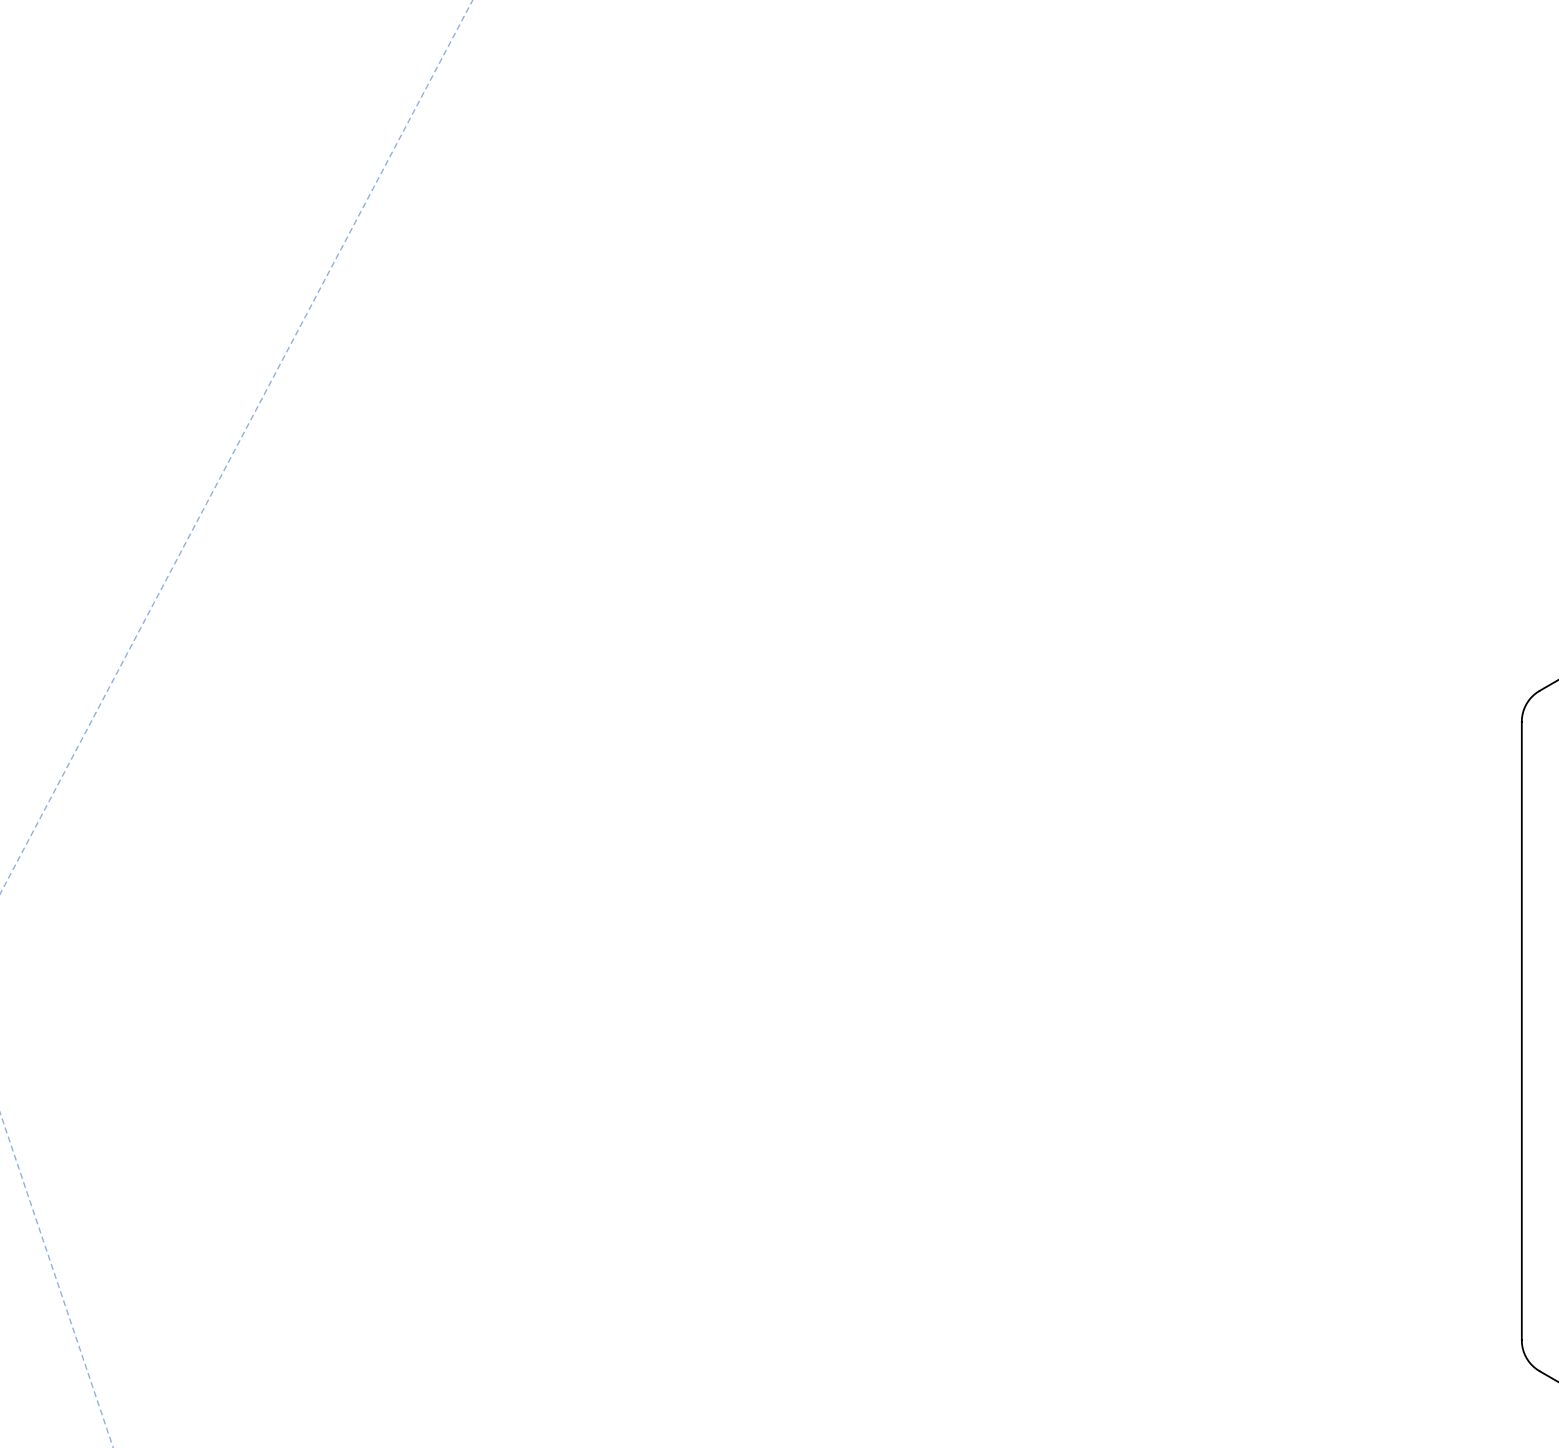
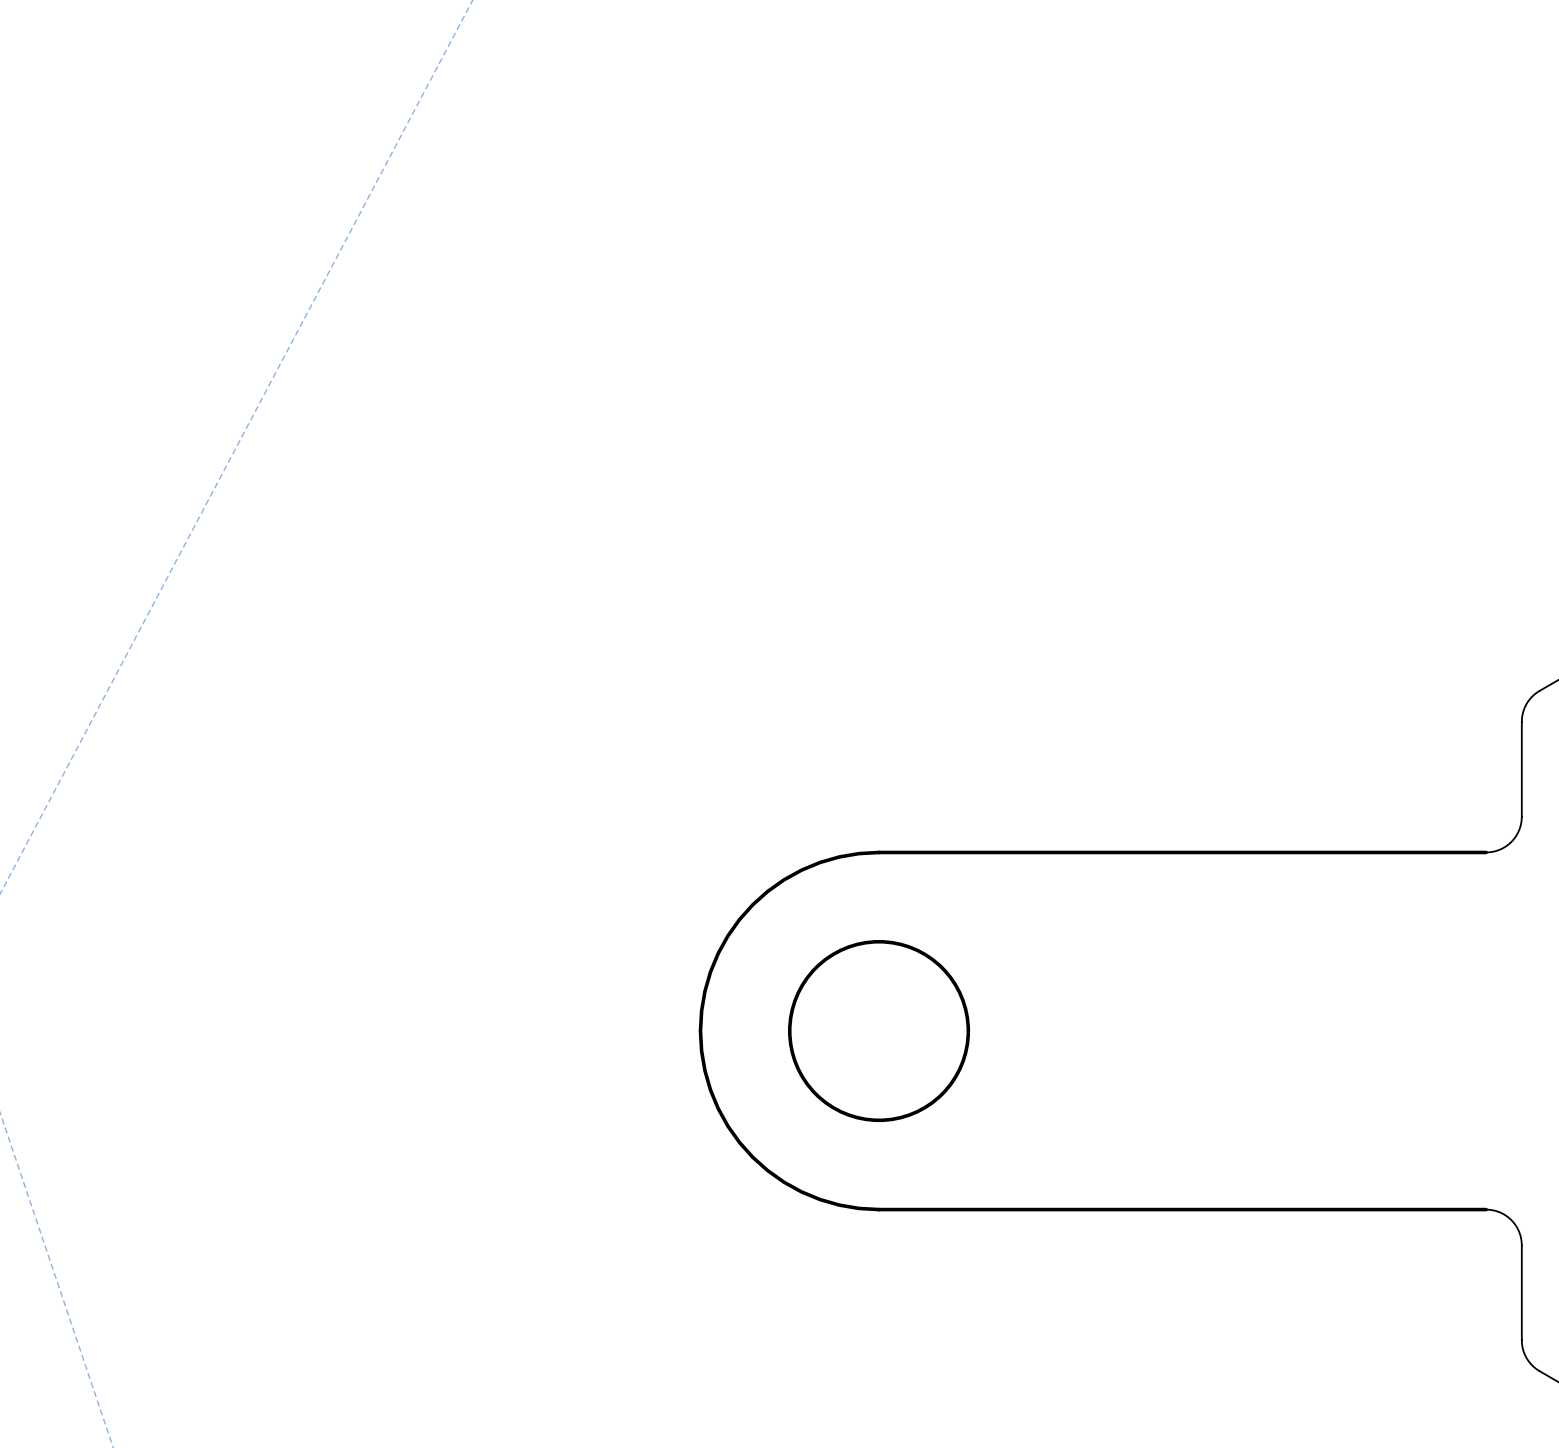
board edge: (1521, 816) (1521, 1245) -> (1521, 816) (1518, 832) (1511, 842) (1501, 848) (1490, 852) (879, 852) (839, 856) (820, 862) (784, 879) (752, 904) (739, 919) (727, 936) (710, 972) (701, 1011) (700, 1031) (701, 1051) (710, 1090) (727, 1126) (739, 1142) (752, 1157) (784, 1182) (820, 1199) (839, 1205) (879, 1209) (1486, 1209) (1499, 1212) (1511, 1220) (1519, 1231) (1521, 1245)
round board edge: none -> [787, 939, 971, 1123]

